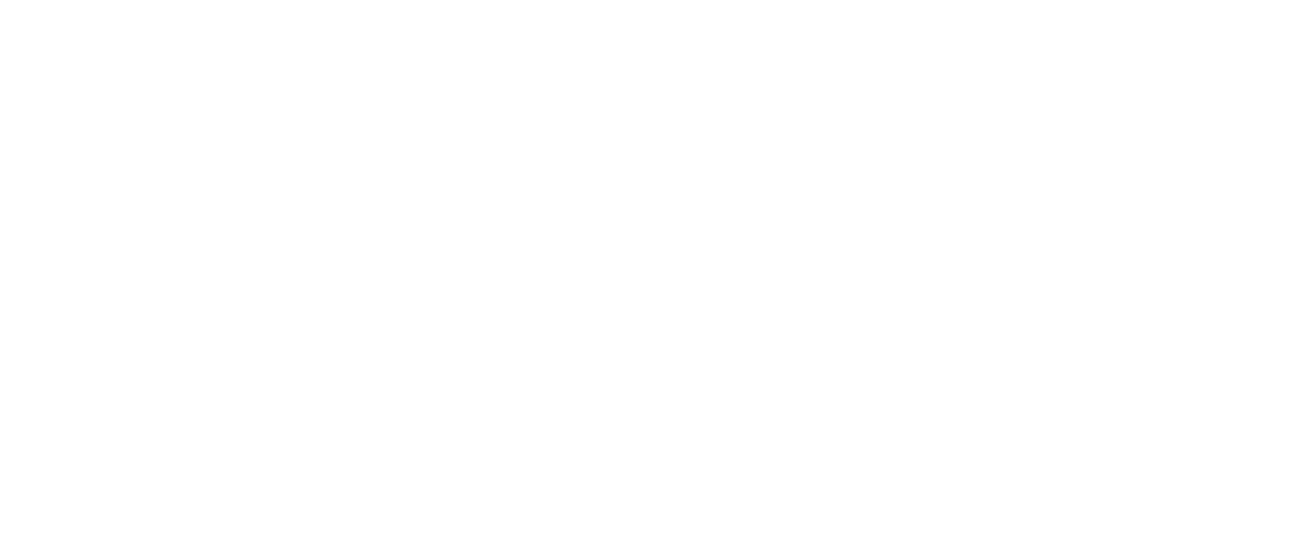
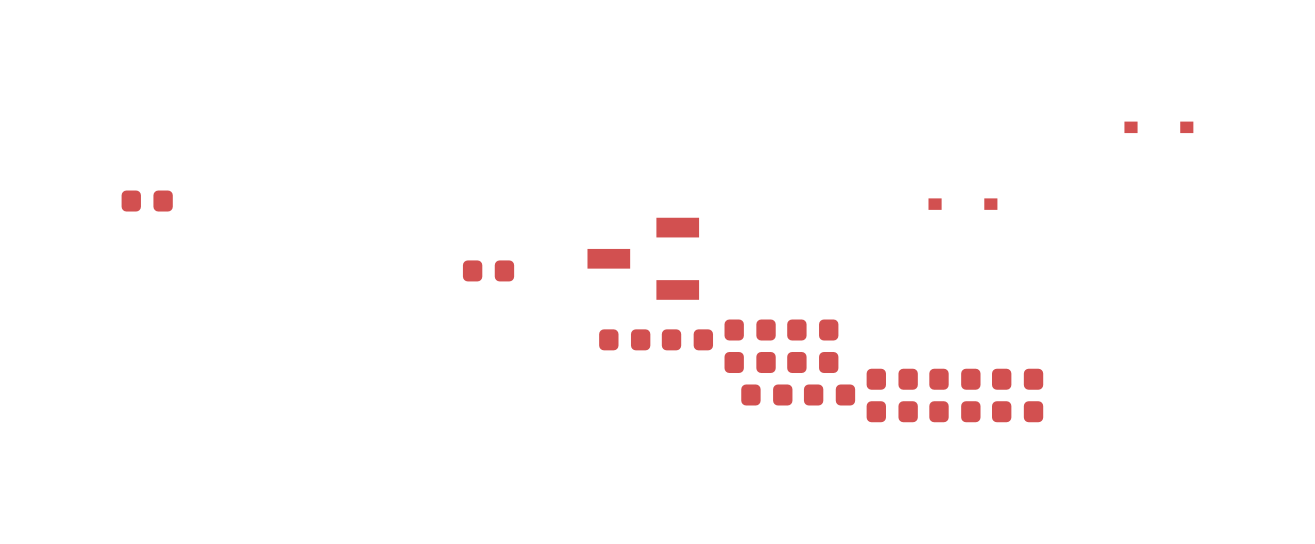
part: none -> (1158, 127)
part: none -> (147, 201)
part: none -> (962, 204)
part: none -> (643, 258)
part: none -> (488, 270)
part: none -> (750, 330)
part: none -> (812, 330)
part: none -> (624, 339)
part: none -> (687, 339)
part: none -> (750, 362)
part: none -> (812, 362)
part: none -> (892, 379)
part: none -> (954, 379)
part: none -> (1017, 379)
part: none -> (766, 394)
part: none -> (829, 394)
part: none -> (892, 411)
part: none -> (954, 411)
part: none -> (1017, 411)

